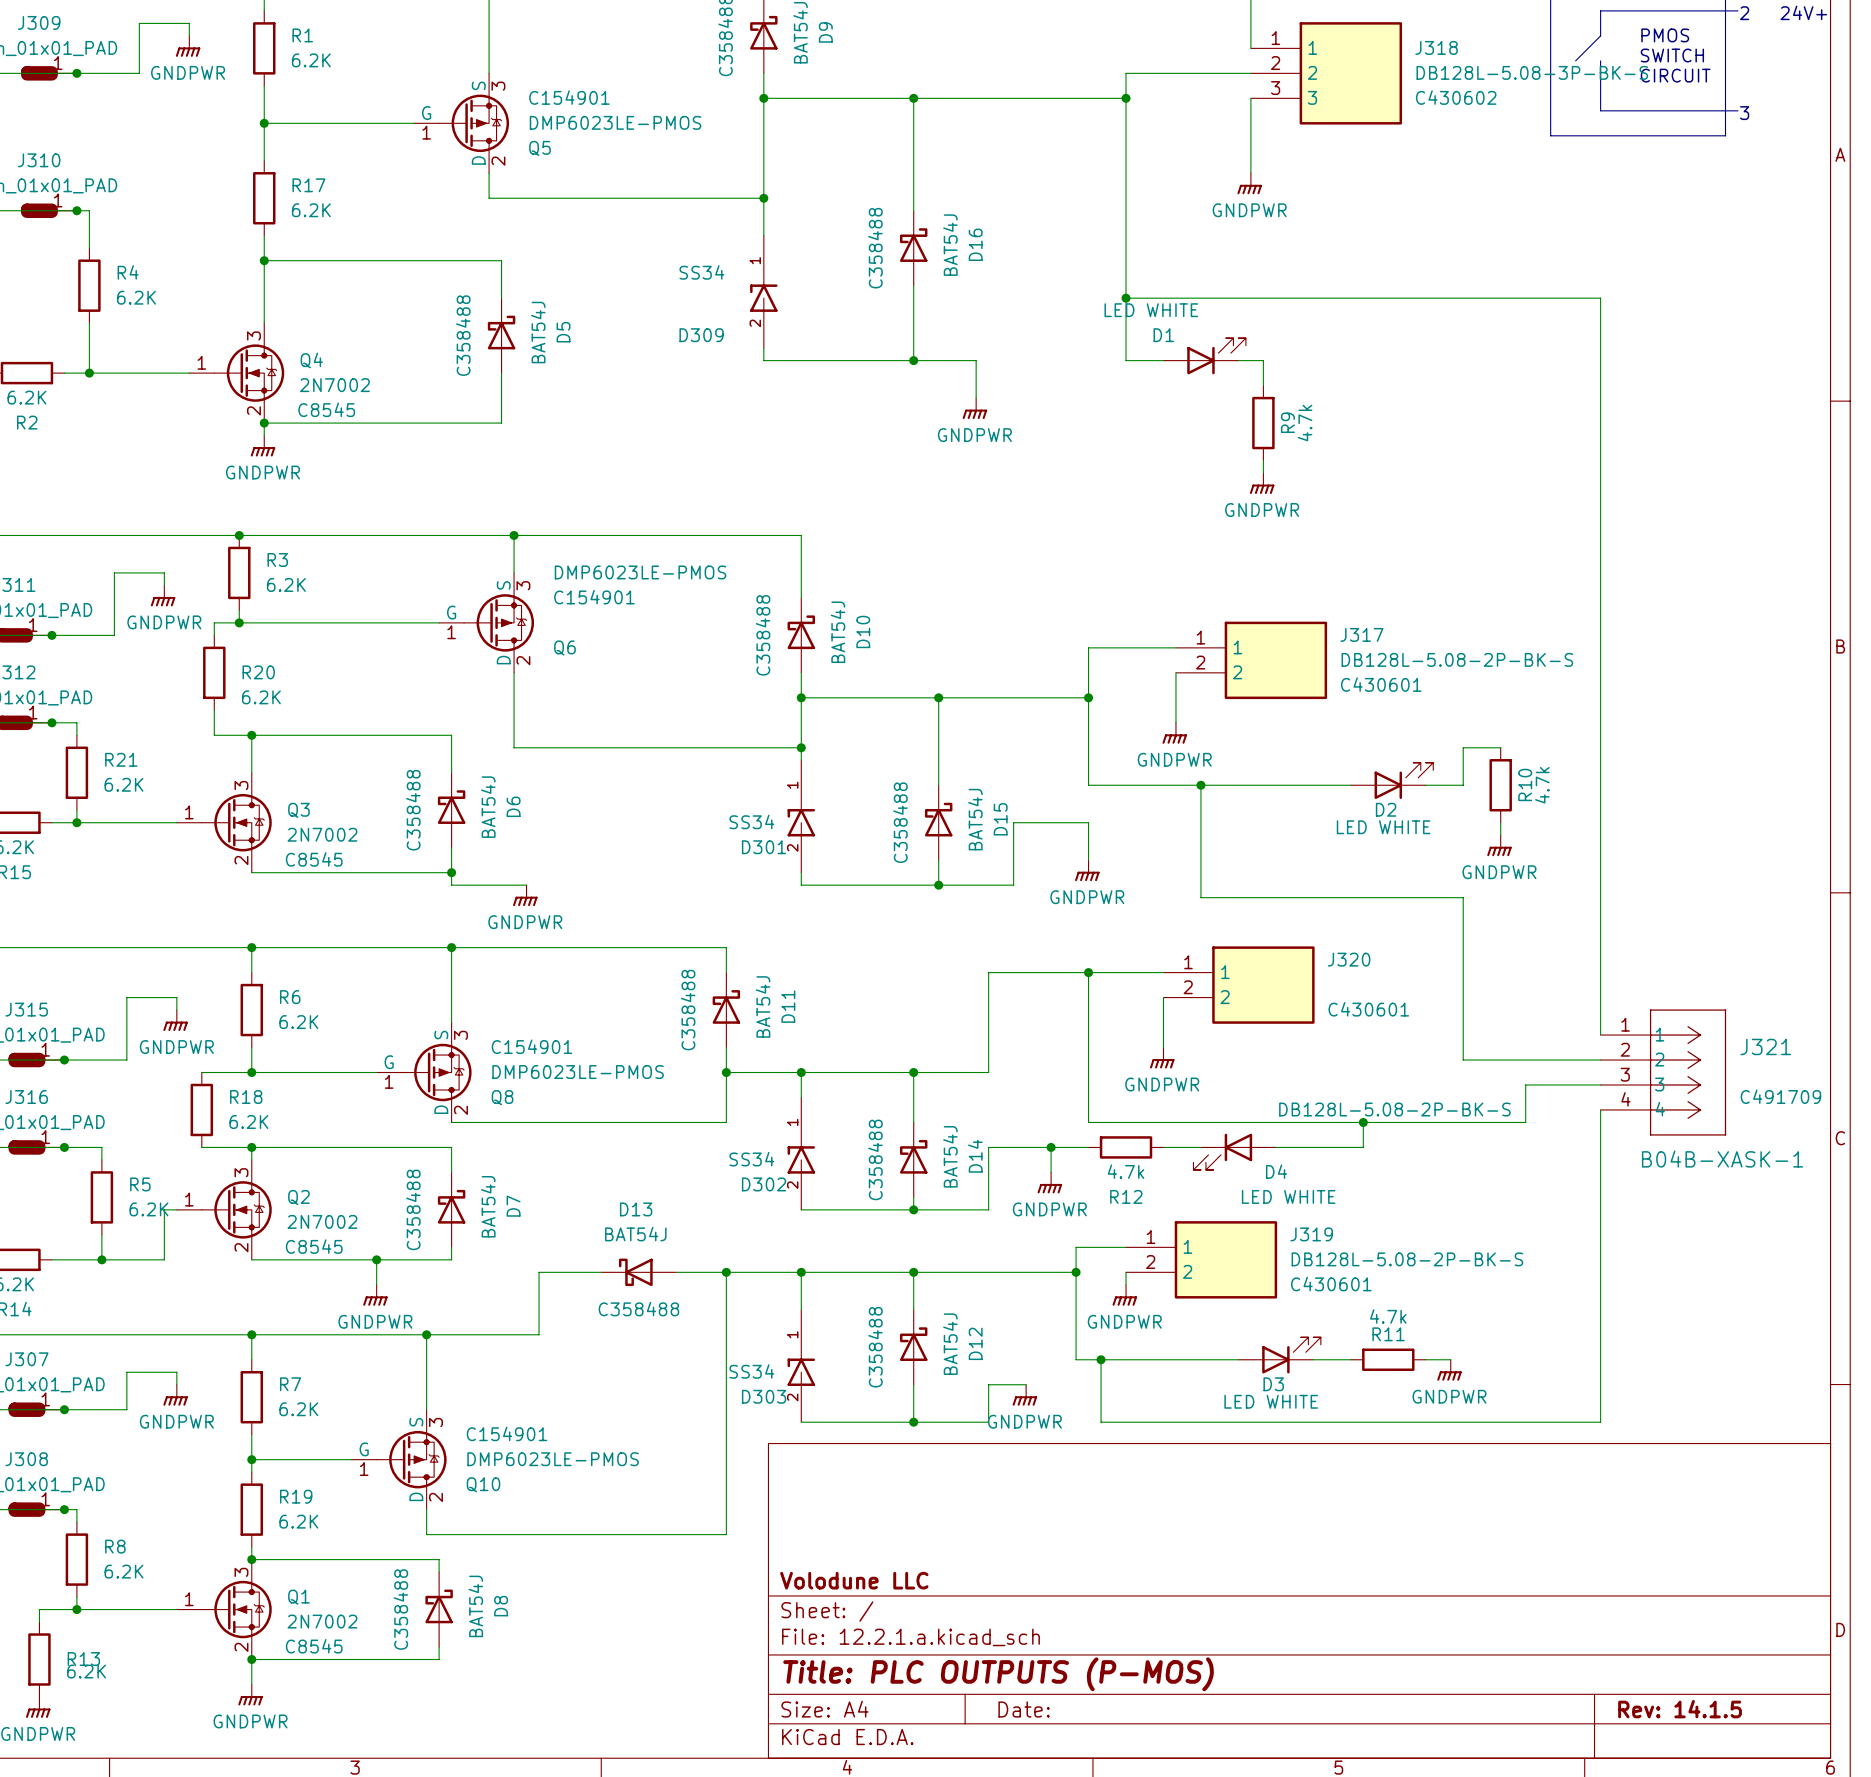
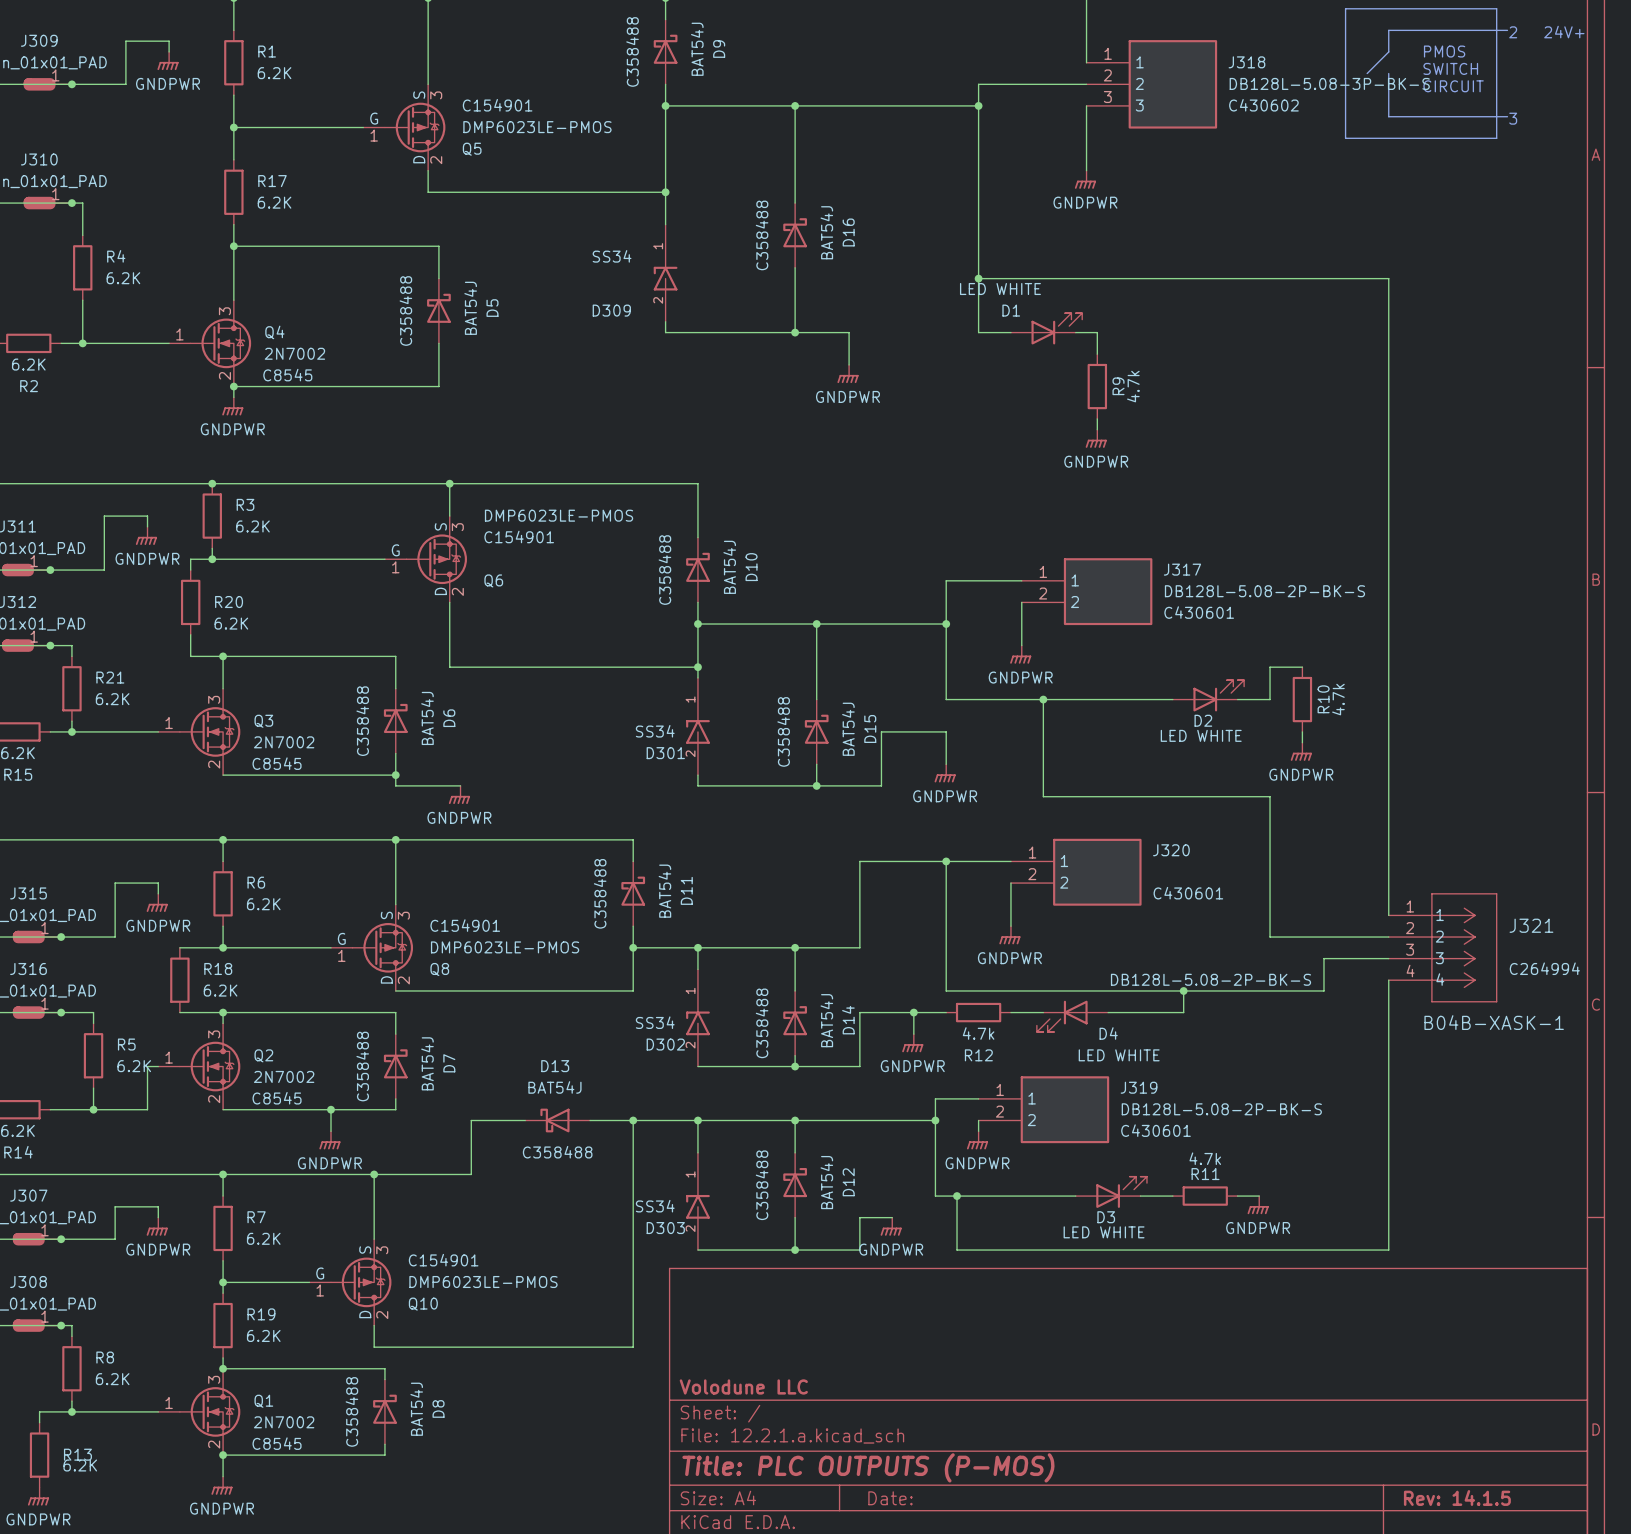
J321 text: C491709 (1780, 1096) -> C264994 (1544, 968)

